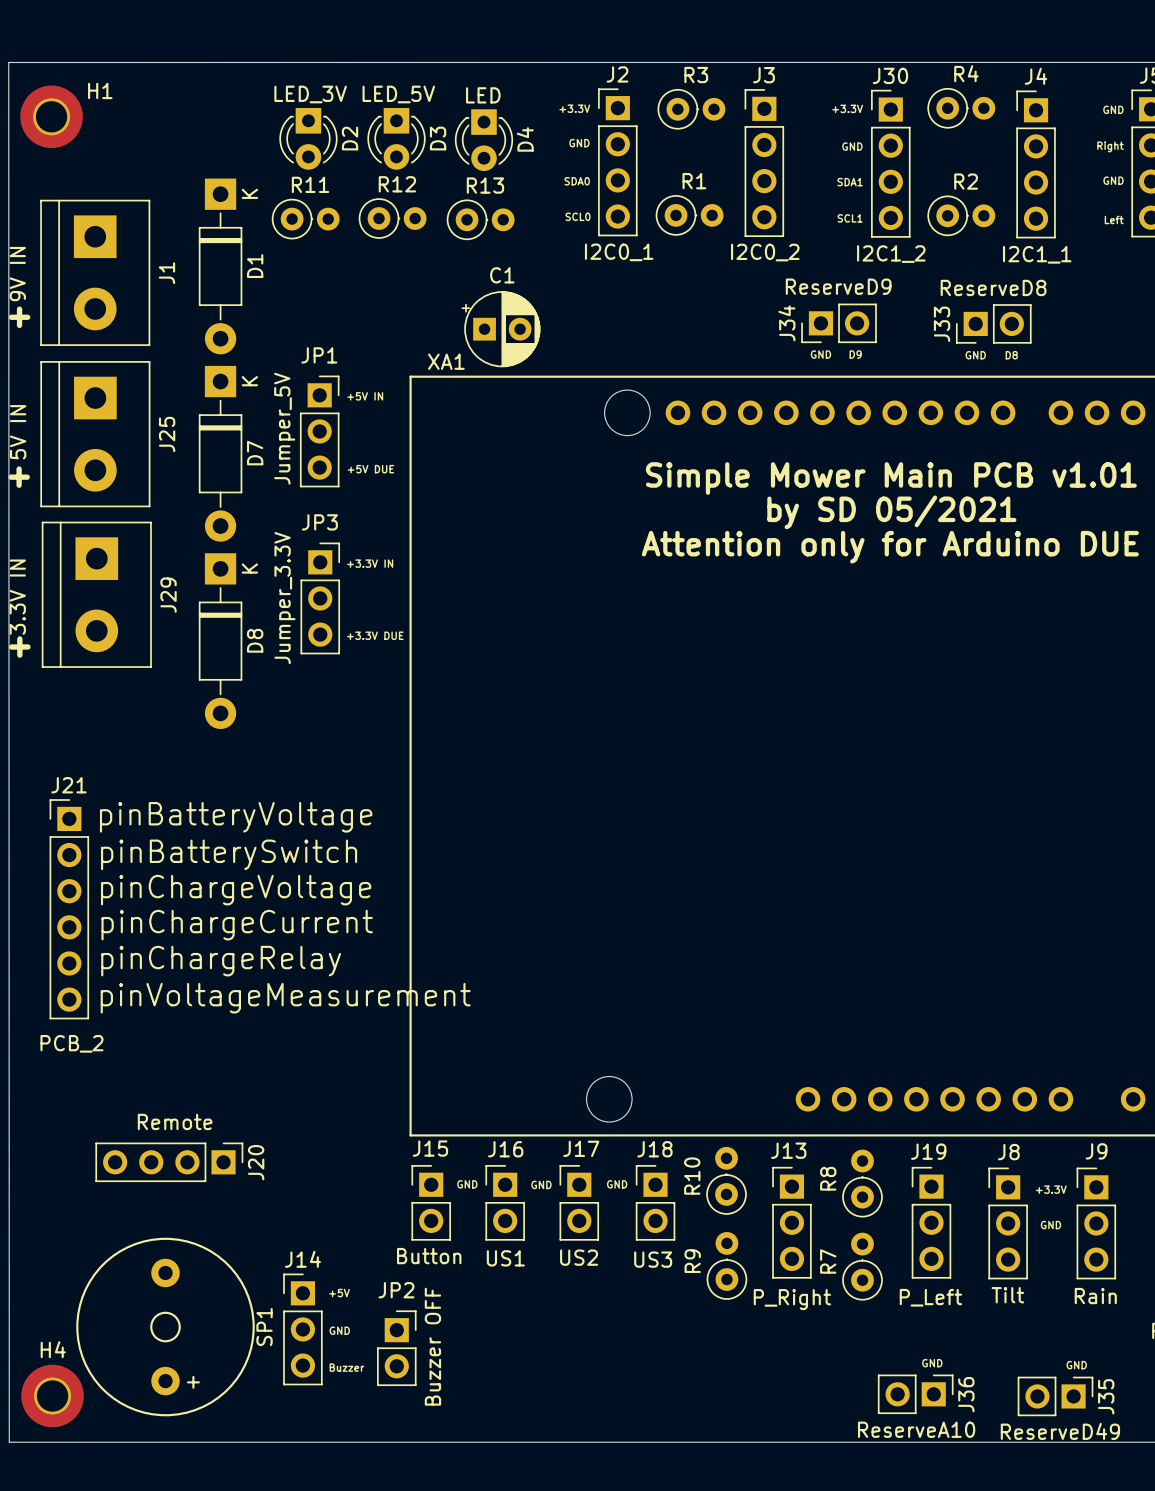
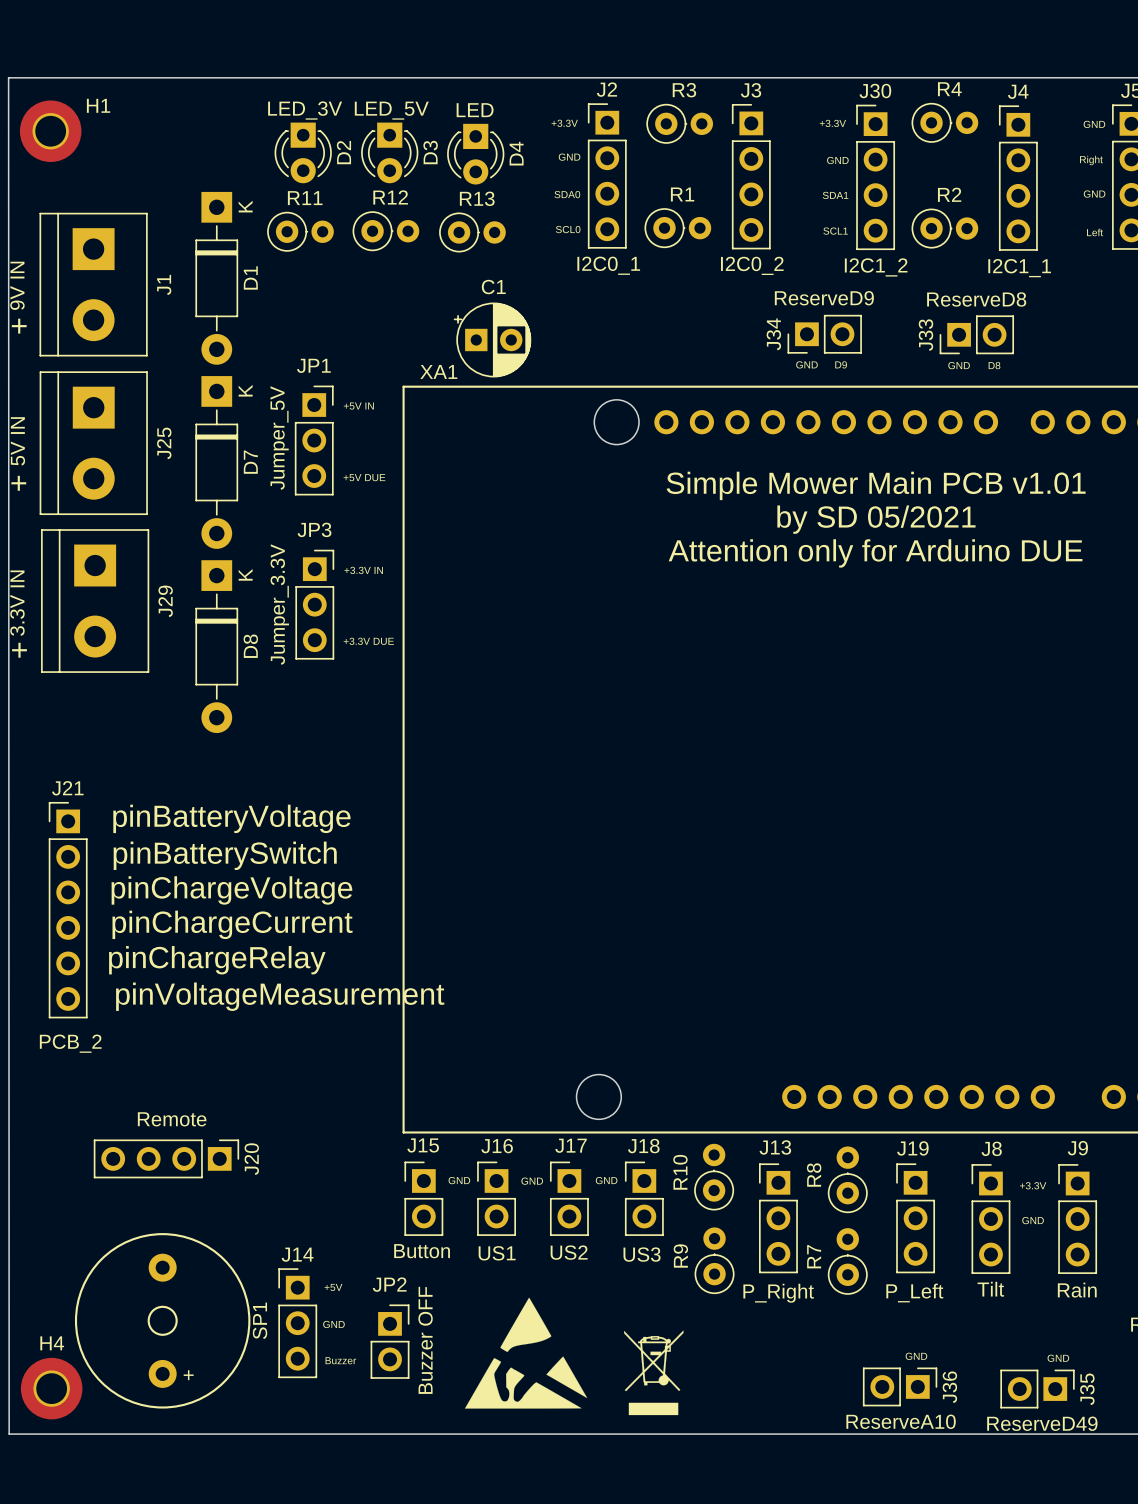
drawing: none -> [464, 1297, 588, 1409]
drawing: none -> [624, 1330, 684, 1416]

